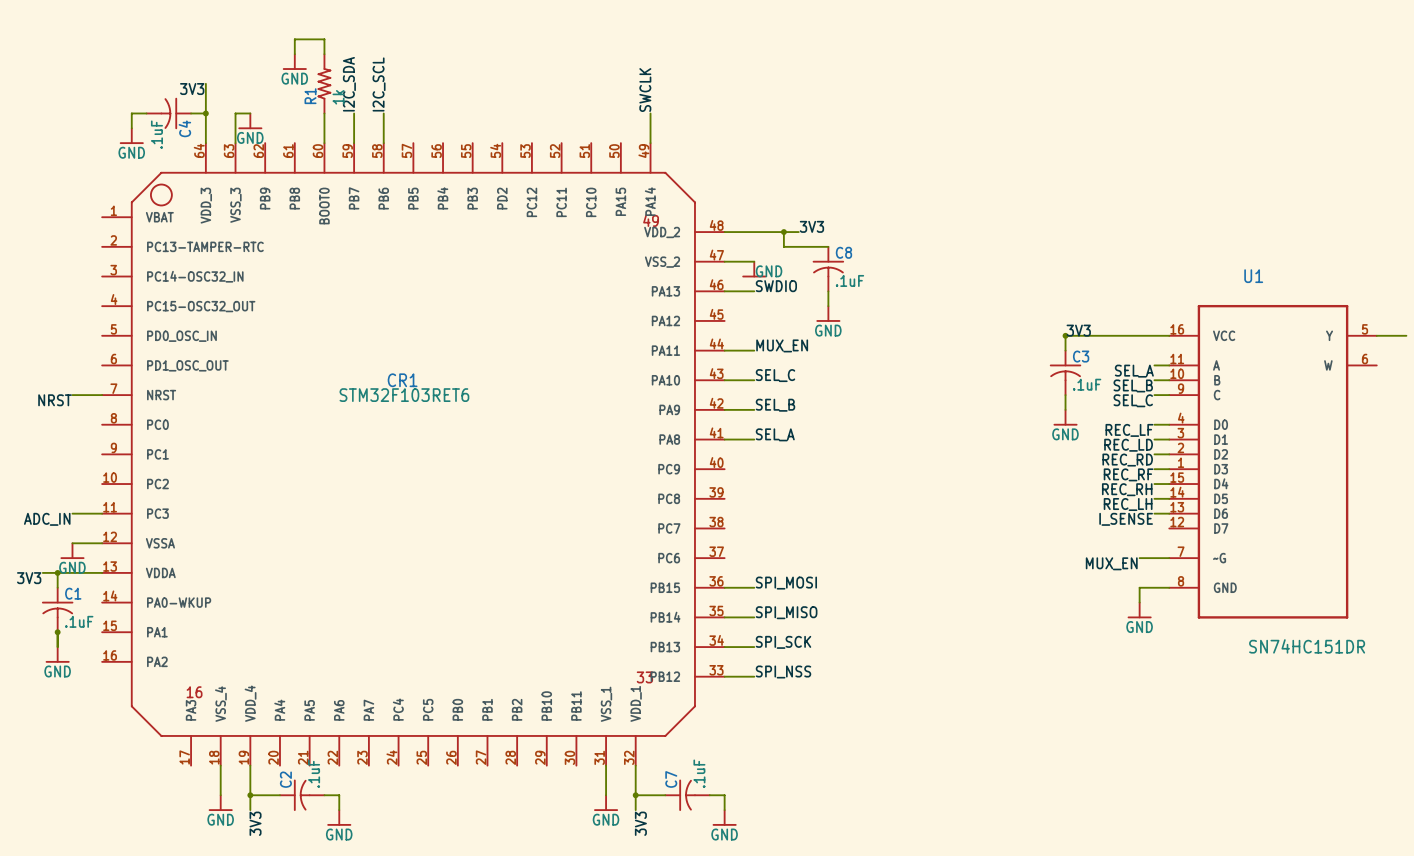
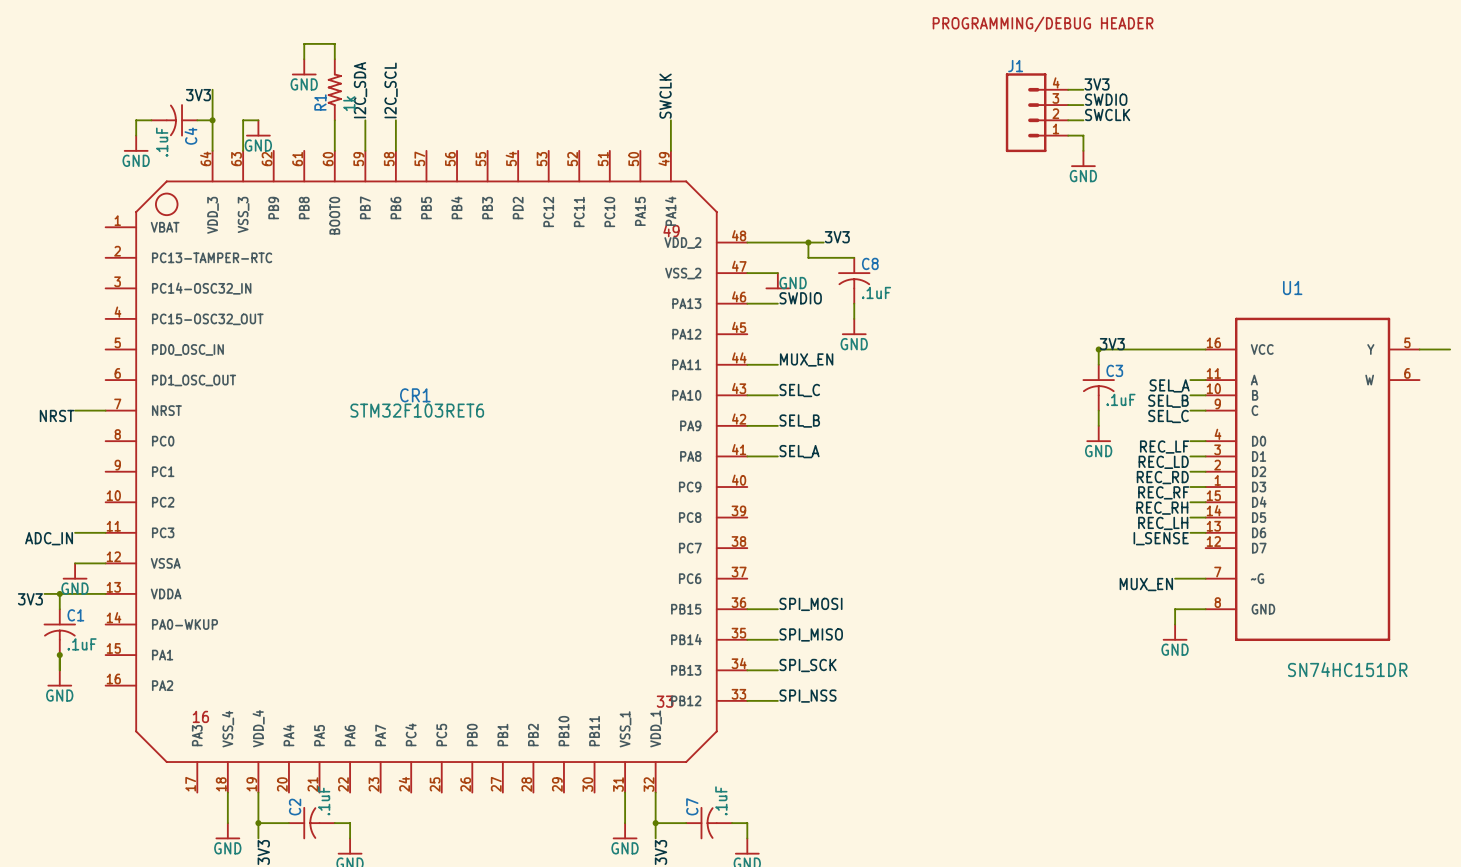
text: none -> PROGRAMMING/DEBUG HEADER (1043, 24)
label: none -> 3V3 (1097, 84)
wire: none -> (1068, 89) (1083, 89)
label: none -> SWDIO (1106, 99)
wire: none -> (1068, 105) (1083, 105)
J1: none -> (1036, 112)
label: none -> SWCLK (1107, 114)
wire: none -> (1068, 120) (1083, 120)
wire: none -> (1068, 135) (1083, 135) (1083, 150)
power symbol: none -> GND (1083, 158)

